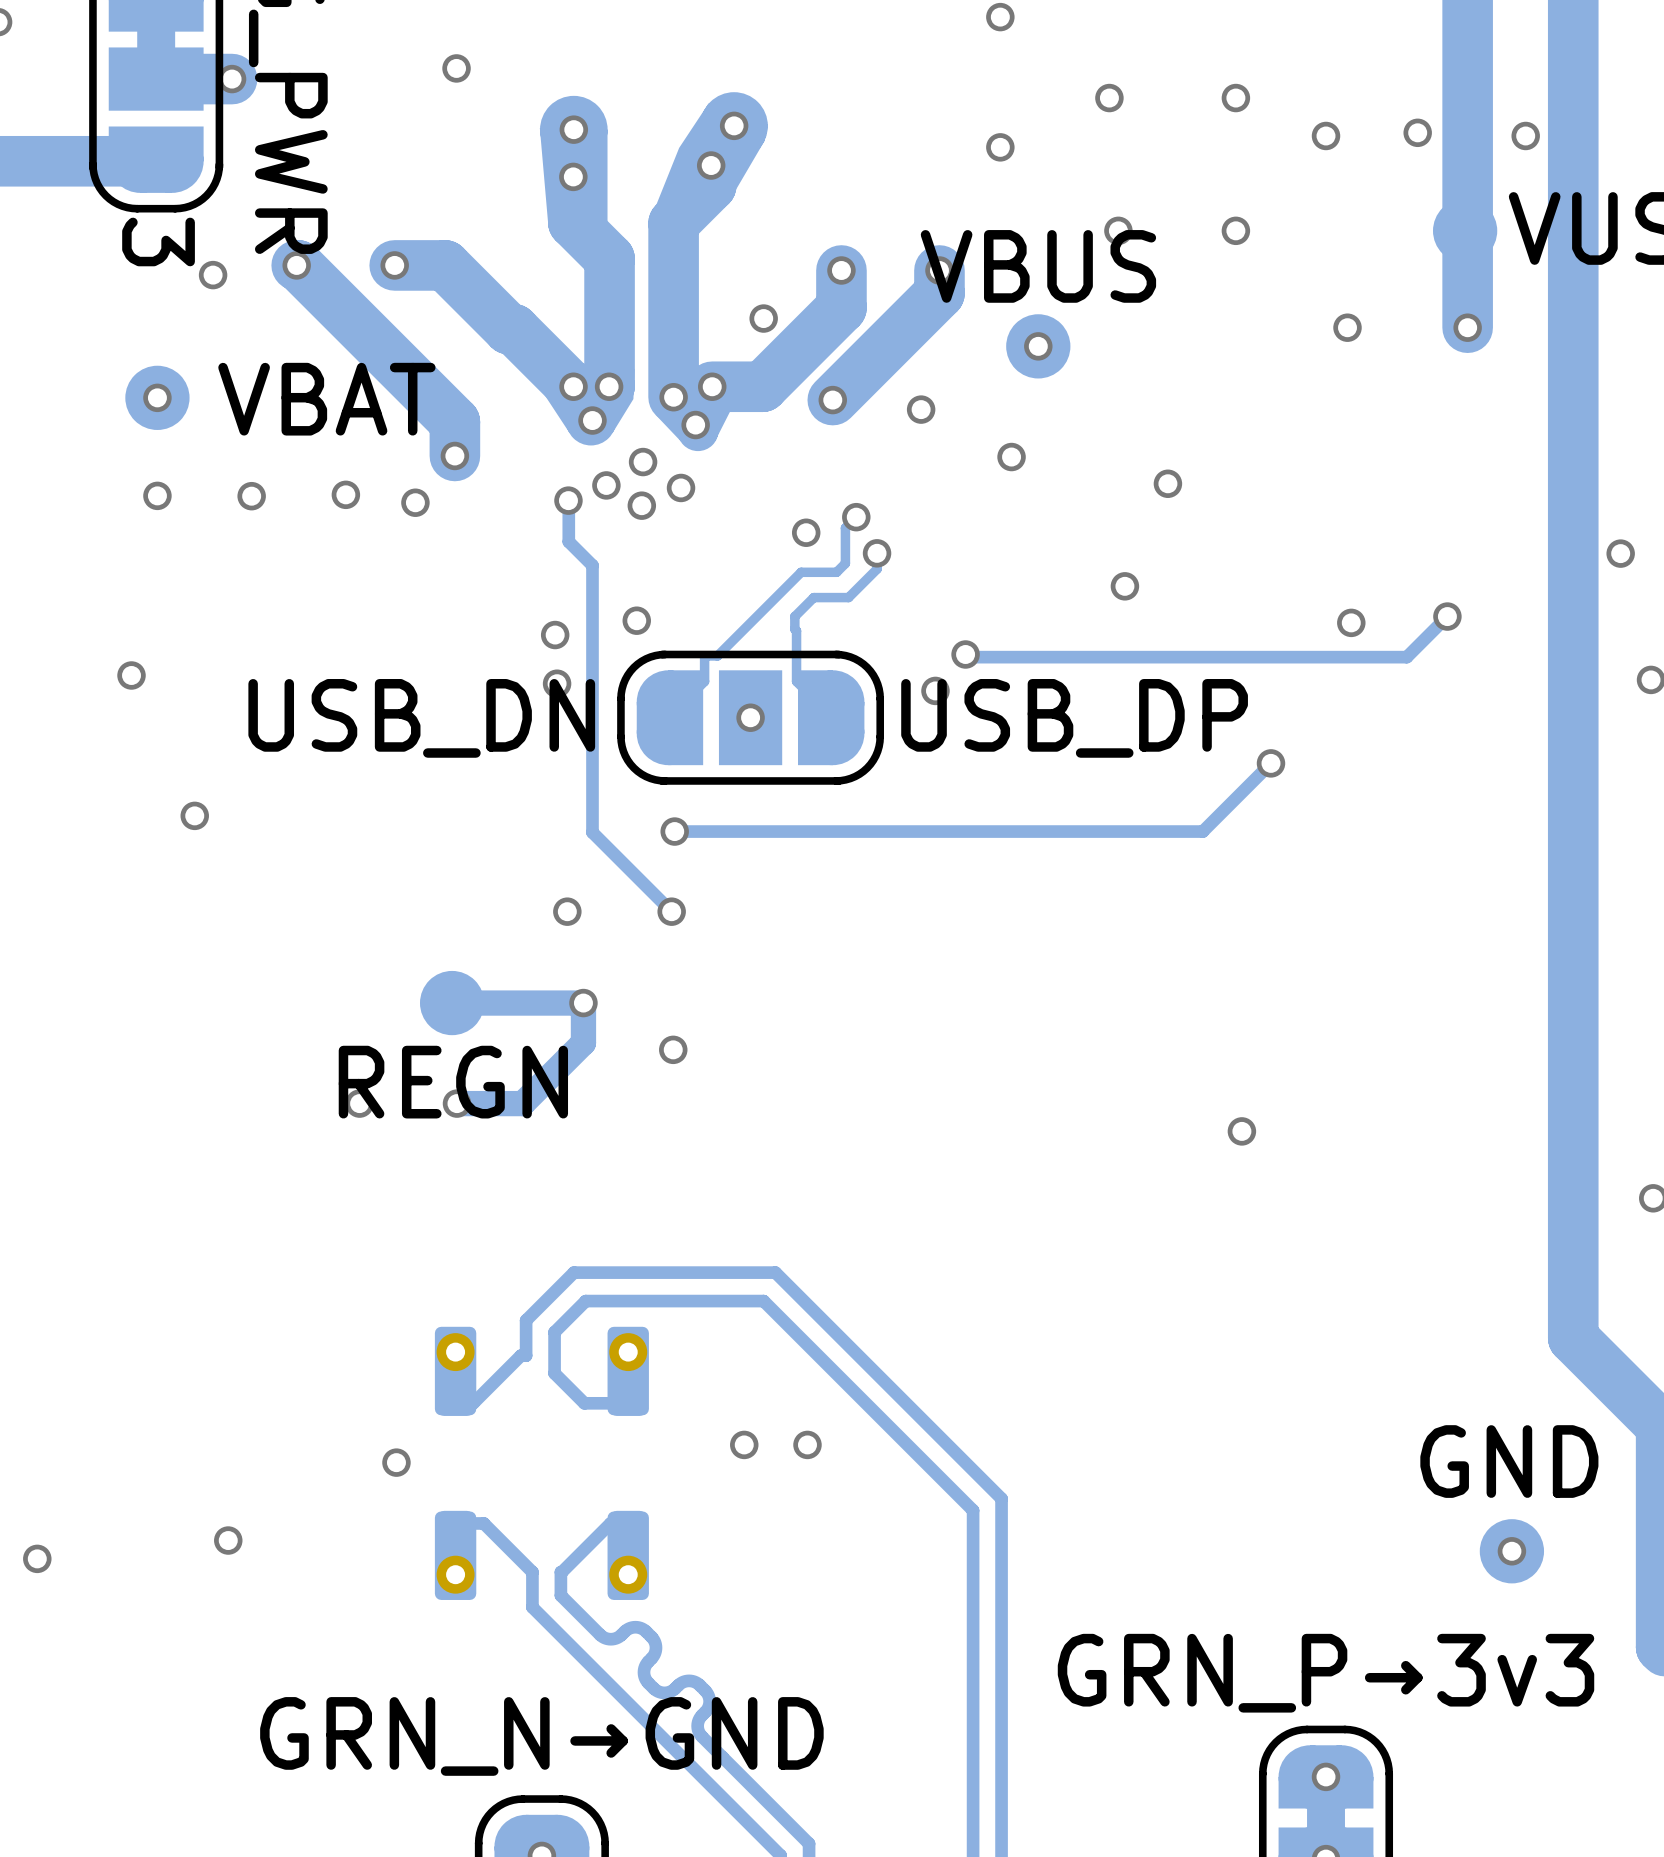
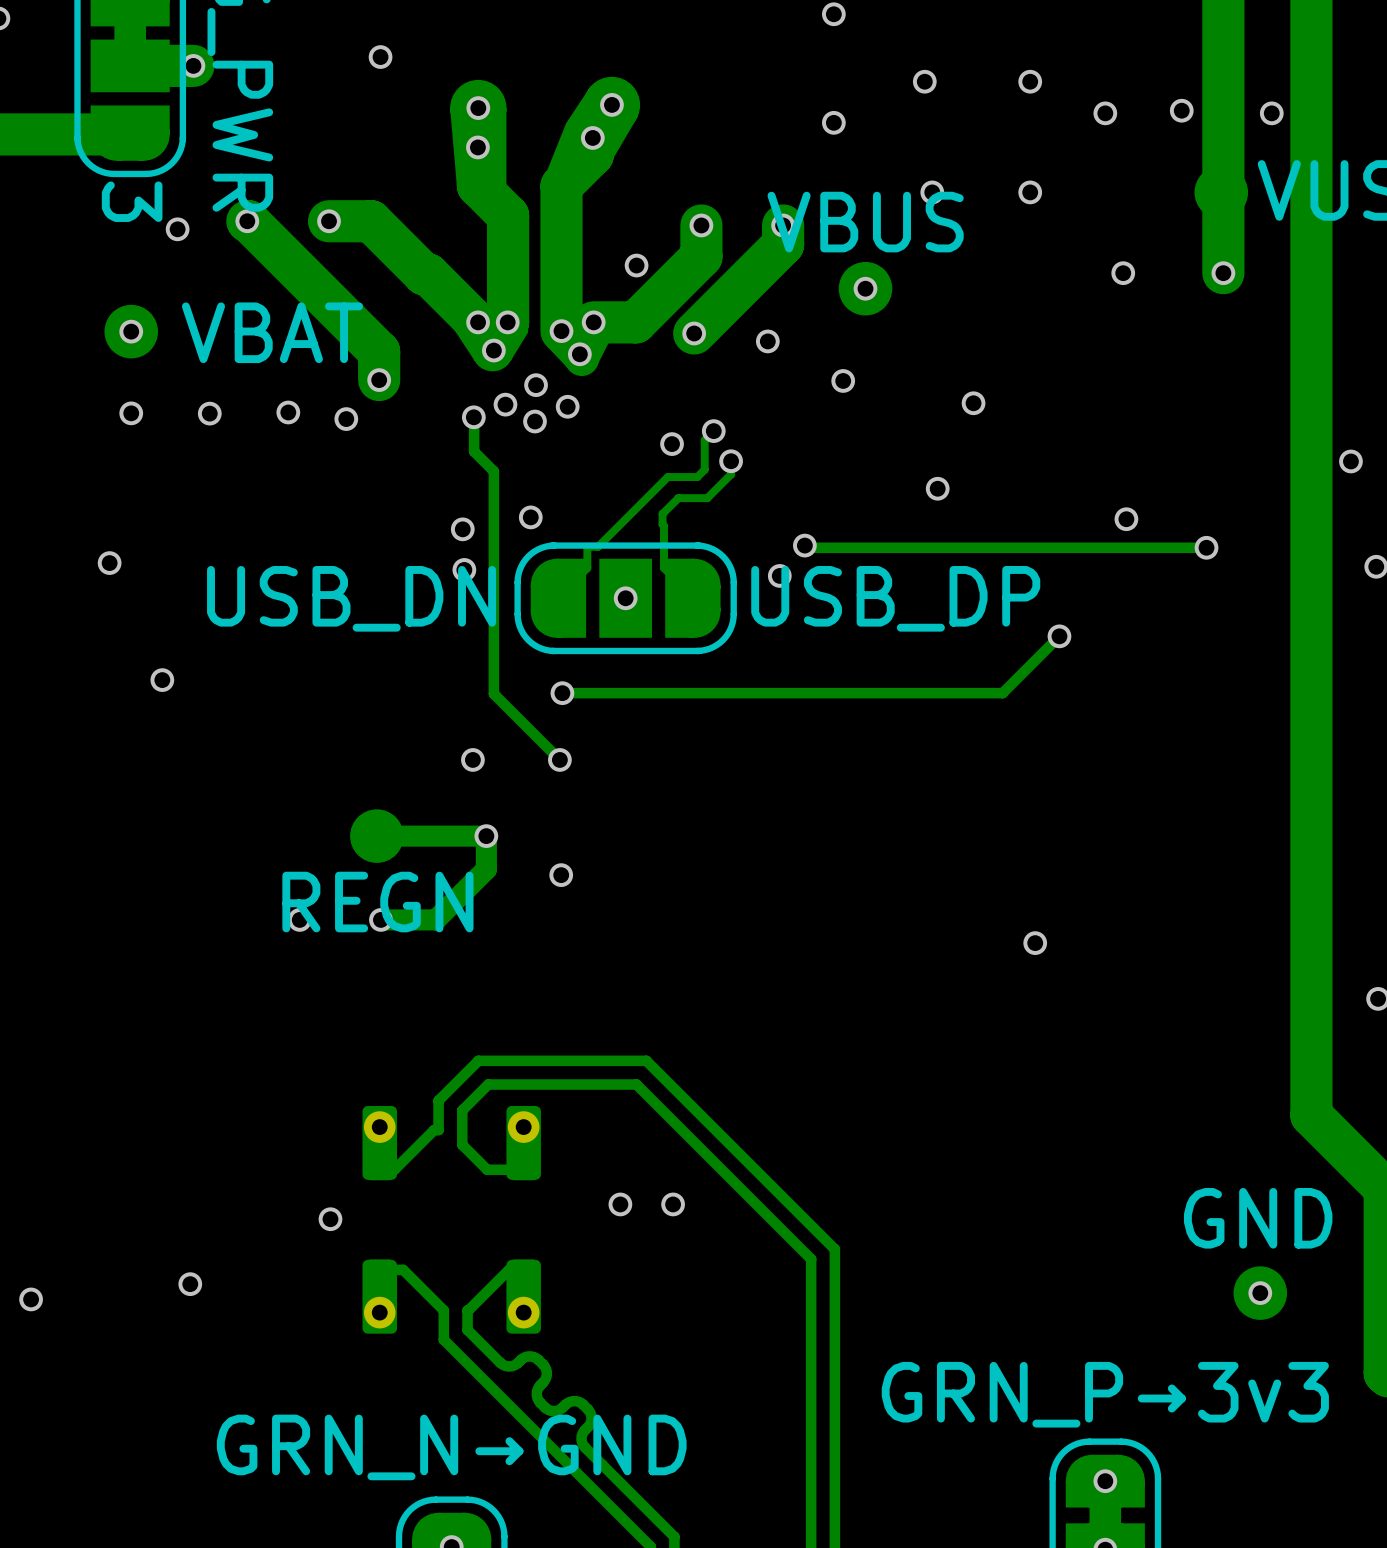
track: (1447, 616) (1406, 657) -> (1206, 547) (1172, 547)
via position: (1447, 616) -> (1206, 547)

